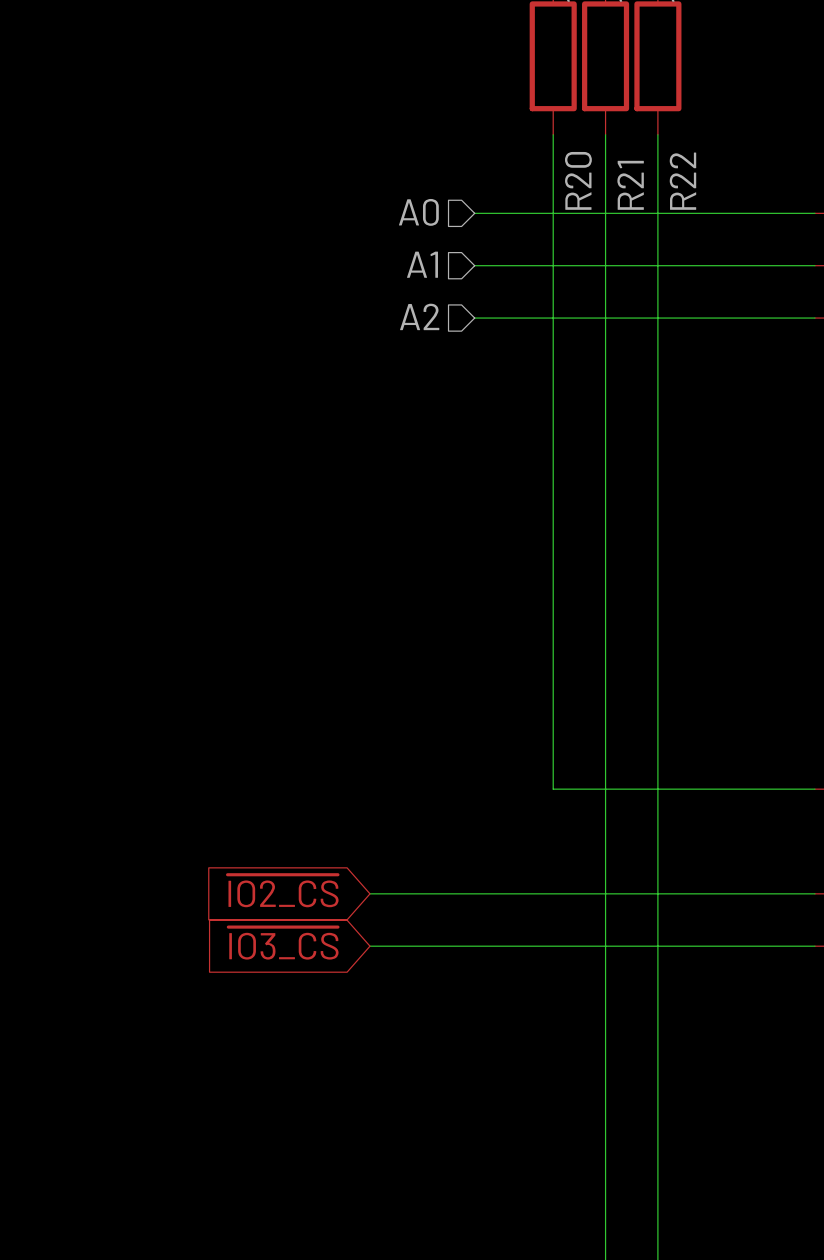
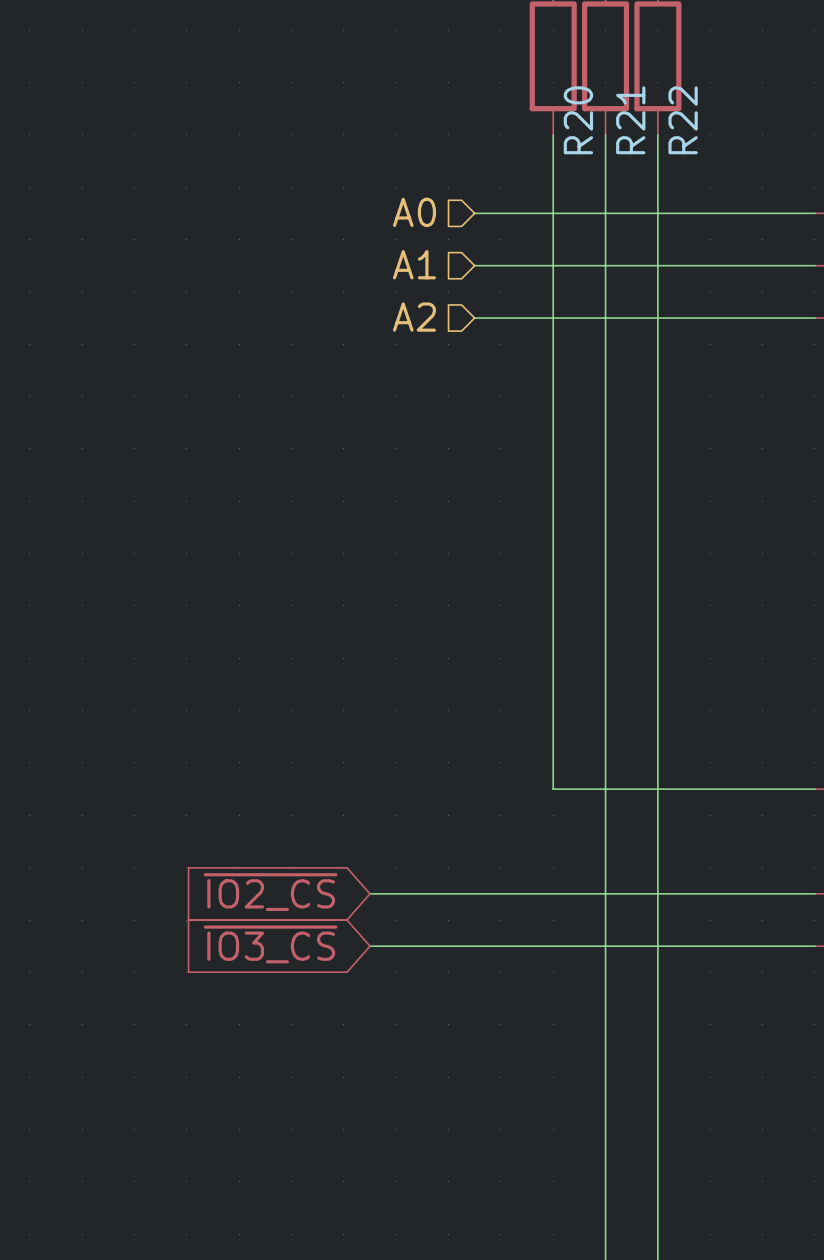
R20 name position: R20 (578, 180) -> R20 (578, 120)
R22 name position: R22 (682, 181) -> R22 (683, 120)
R21 name position: R21 (630, 185) -> R21 (630, 120)

